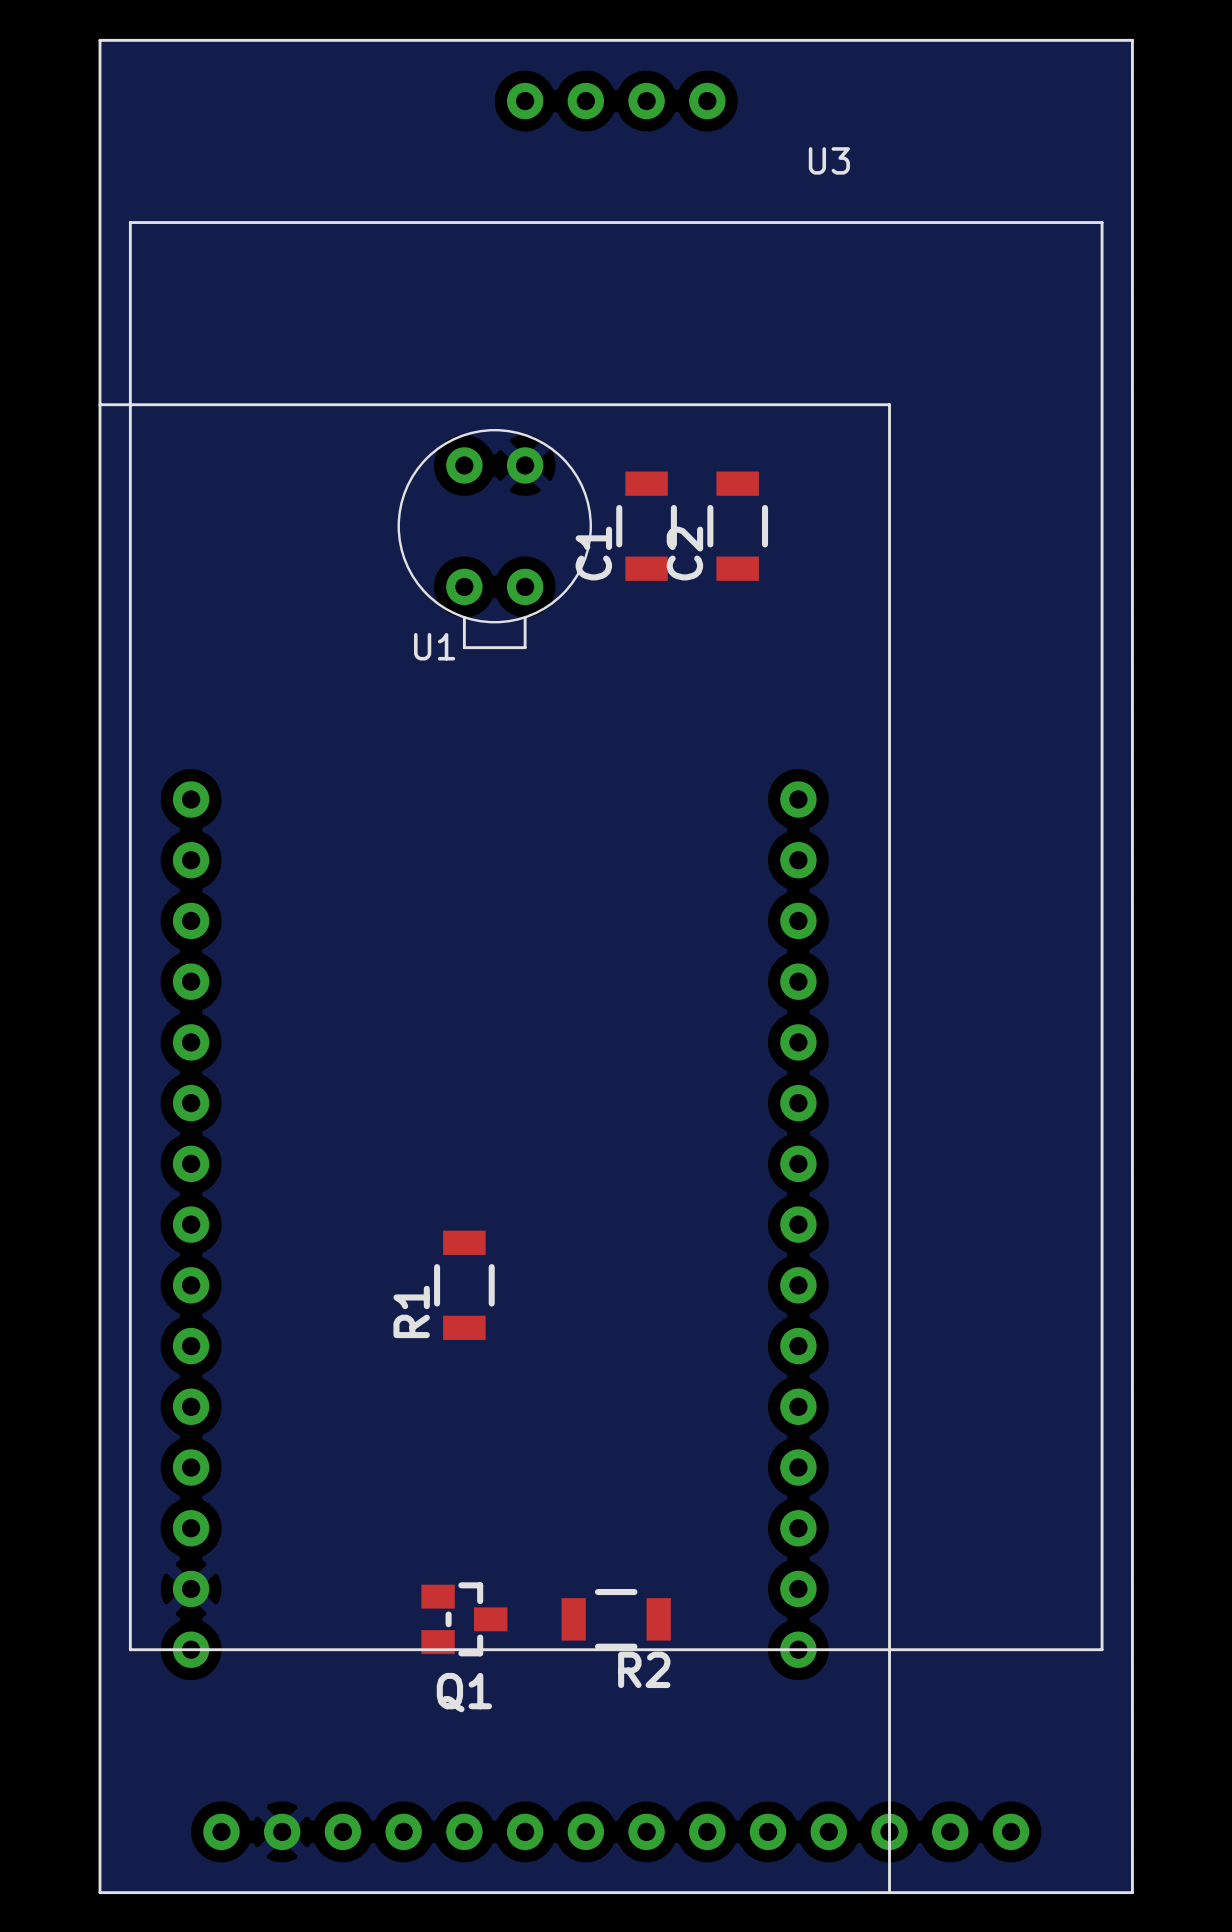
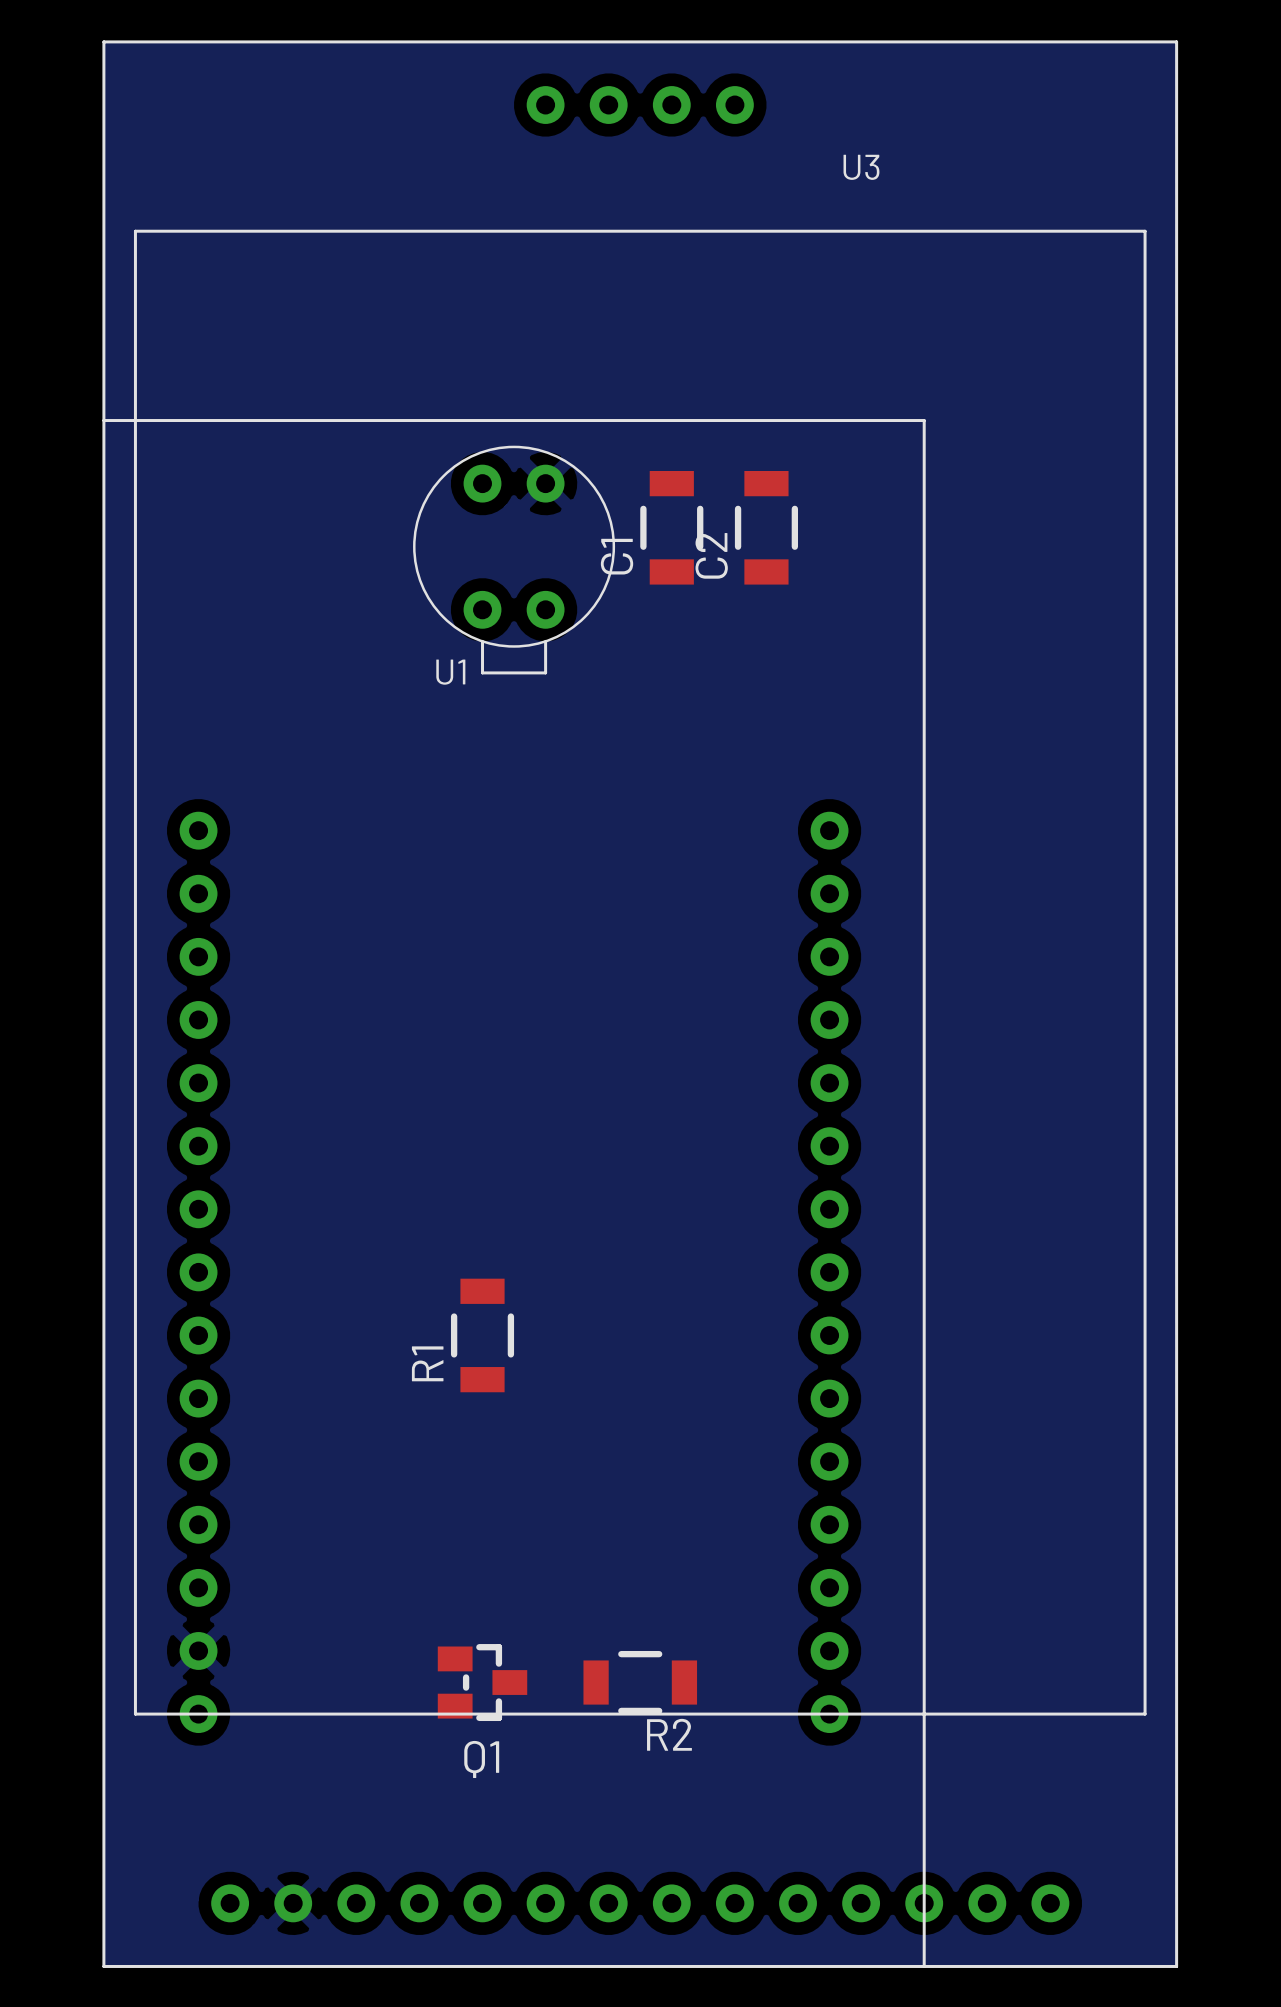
C1 position: (646, 526) -> (671, 527)
C2 position: (737, 526) -> (766, 527)

